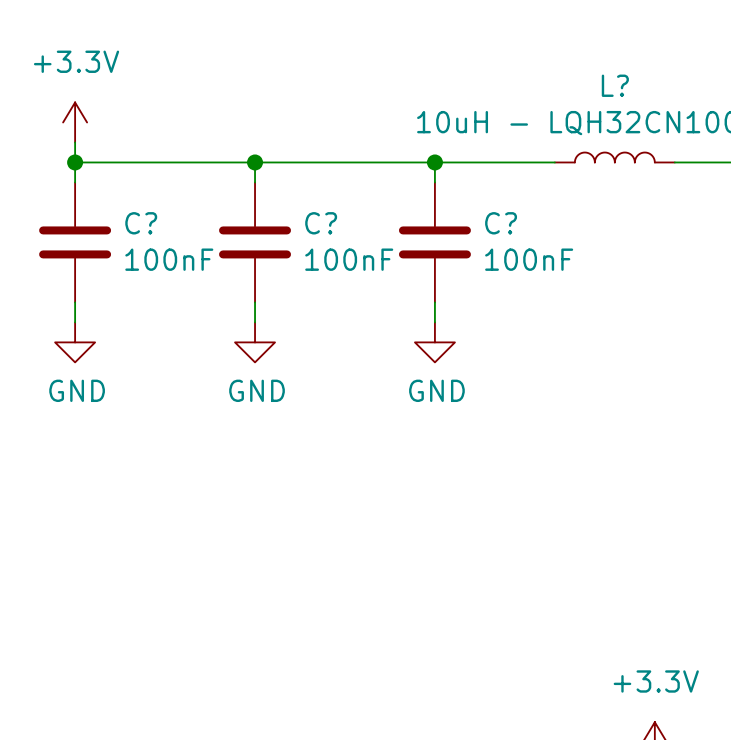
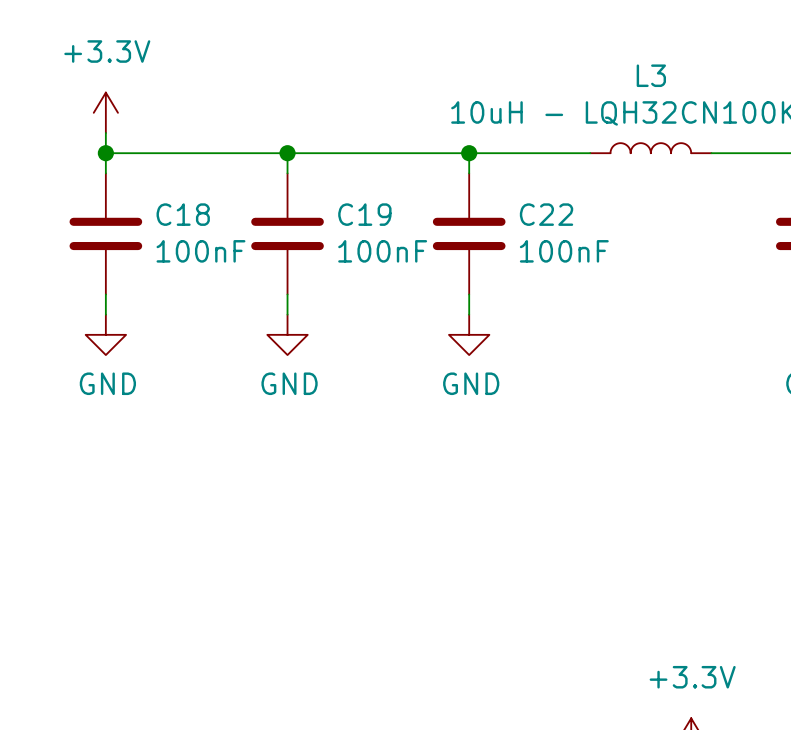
L? name: L? (615, 85) -> L3 (651, 75)
C? name: C? (141, 223) -> C18 (183, 214)
C? name: C? (321, 223) -> C19 (364, 214)
C? name: C? (501, 223) -> C22 (546, 214)

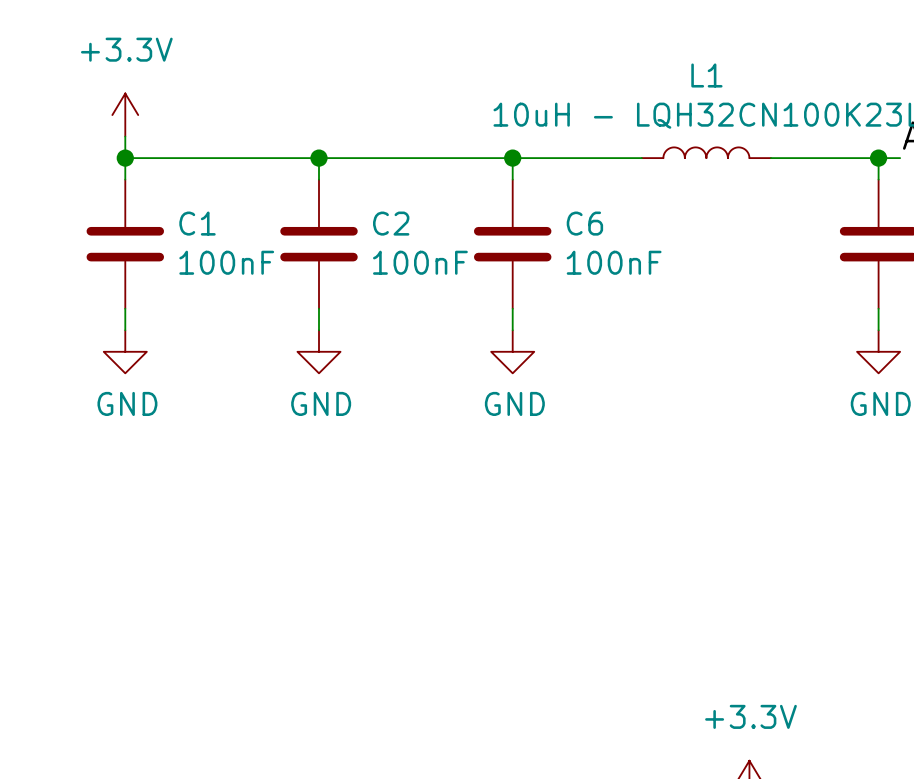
L3 name: L3 (651, 75) -> L1 (706, 75)
C18 name: C18 (183, 214) -> C1 (197, 223)
C19 name: C19 (364, 214) -> C2 (391, 223)
C22 name: C22 (546, 214) -> C6 (584, 223)

